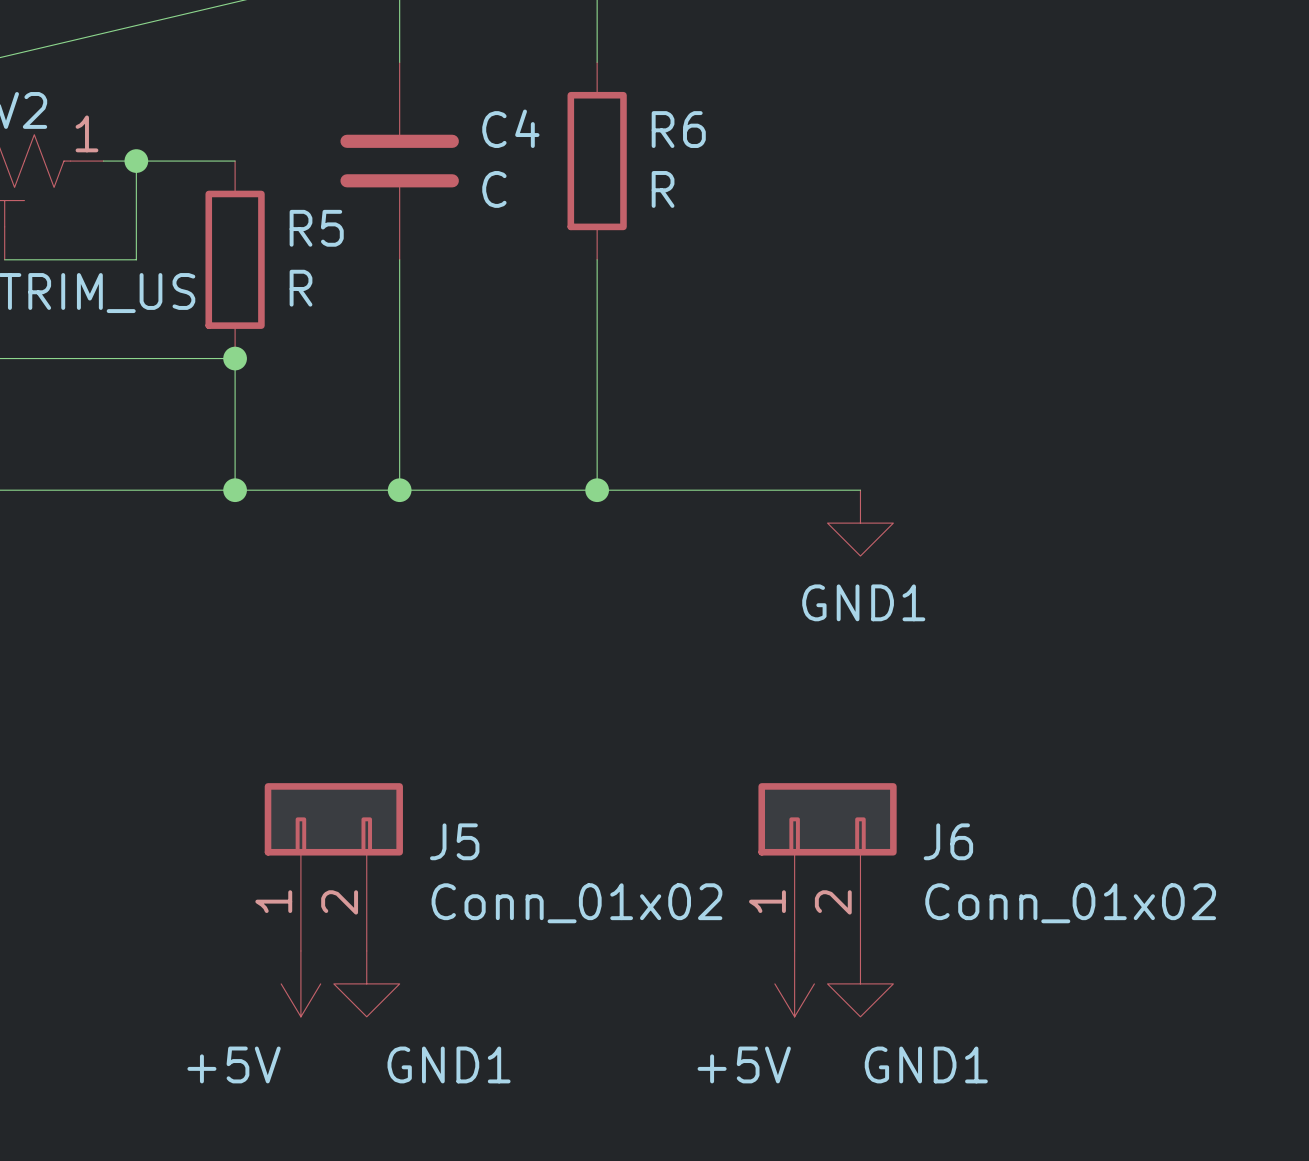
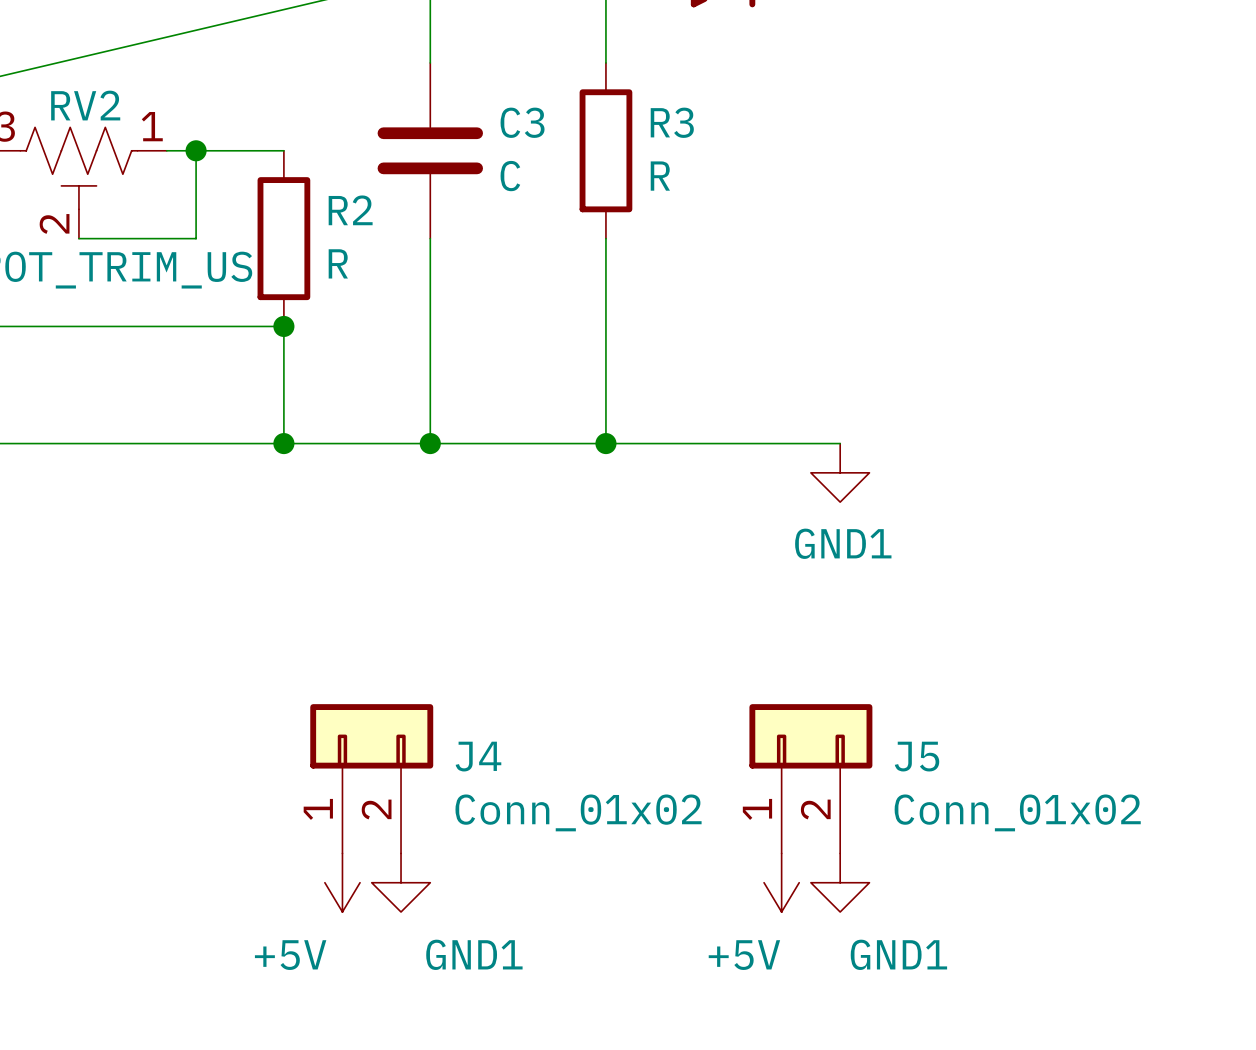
C4 name: C4 (510, 128) -> C3 (522, 122)
R6 name: R6 (678, 129) -> R3 (672, 122)
R5 name: R5 (316, 228) -> R2 (350, 210)
J5 name: J5 (454, 841) -> J4 (478, 756)
J6 name: J6 (948, 841) -> J5 (917, 756)

